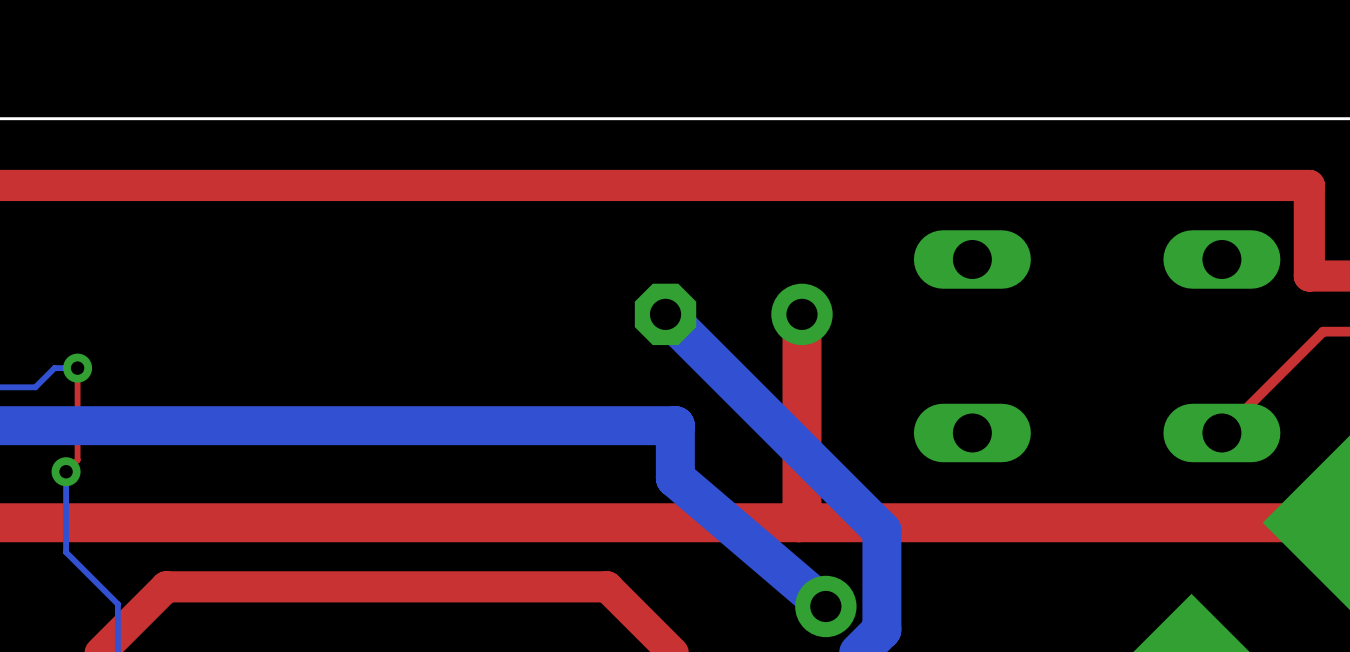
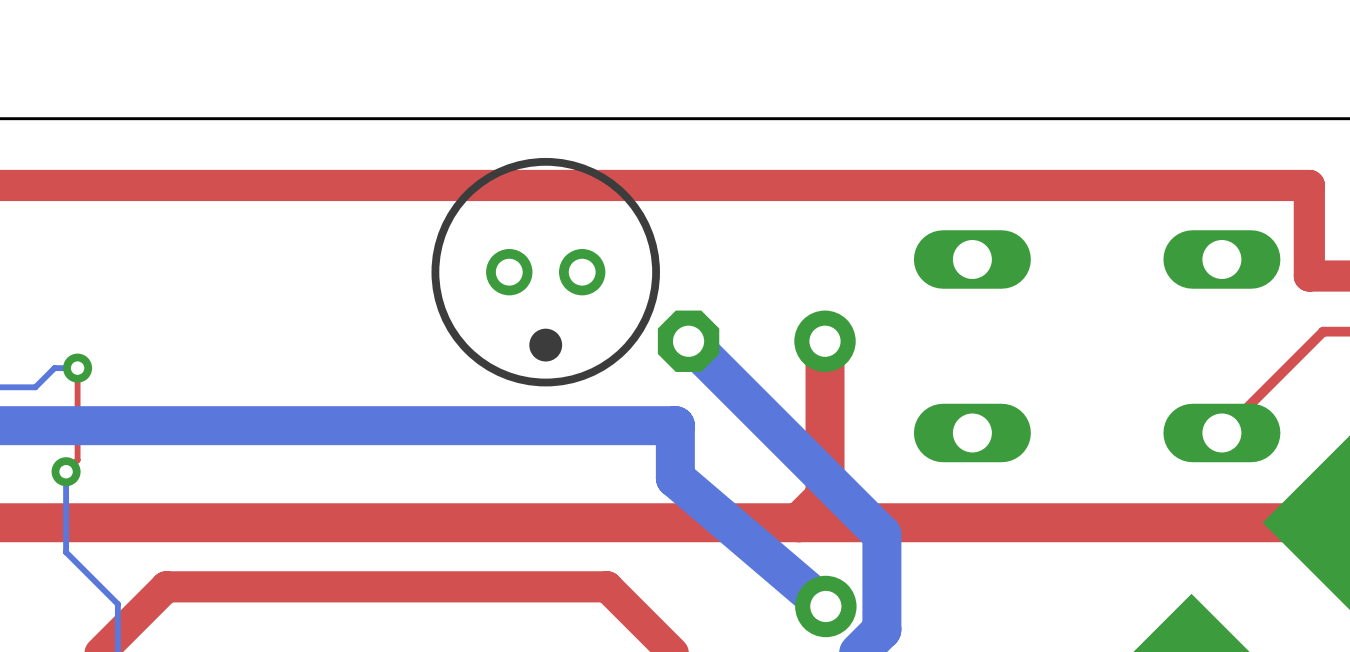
part: none -> (545, 272)
bottom track: (665, 314) (881, 530) (881, 534) -> (688, 341) (881, 534)
part position: (733, 314) -> (756, 341)
top track: (801, 314) (801, 519) -> (825, 341) (825, 496) (801, 519)

